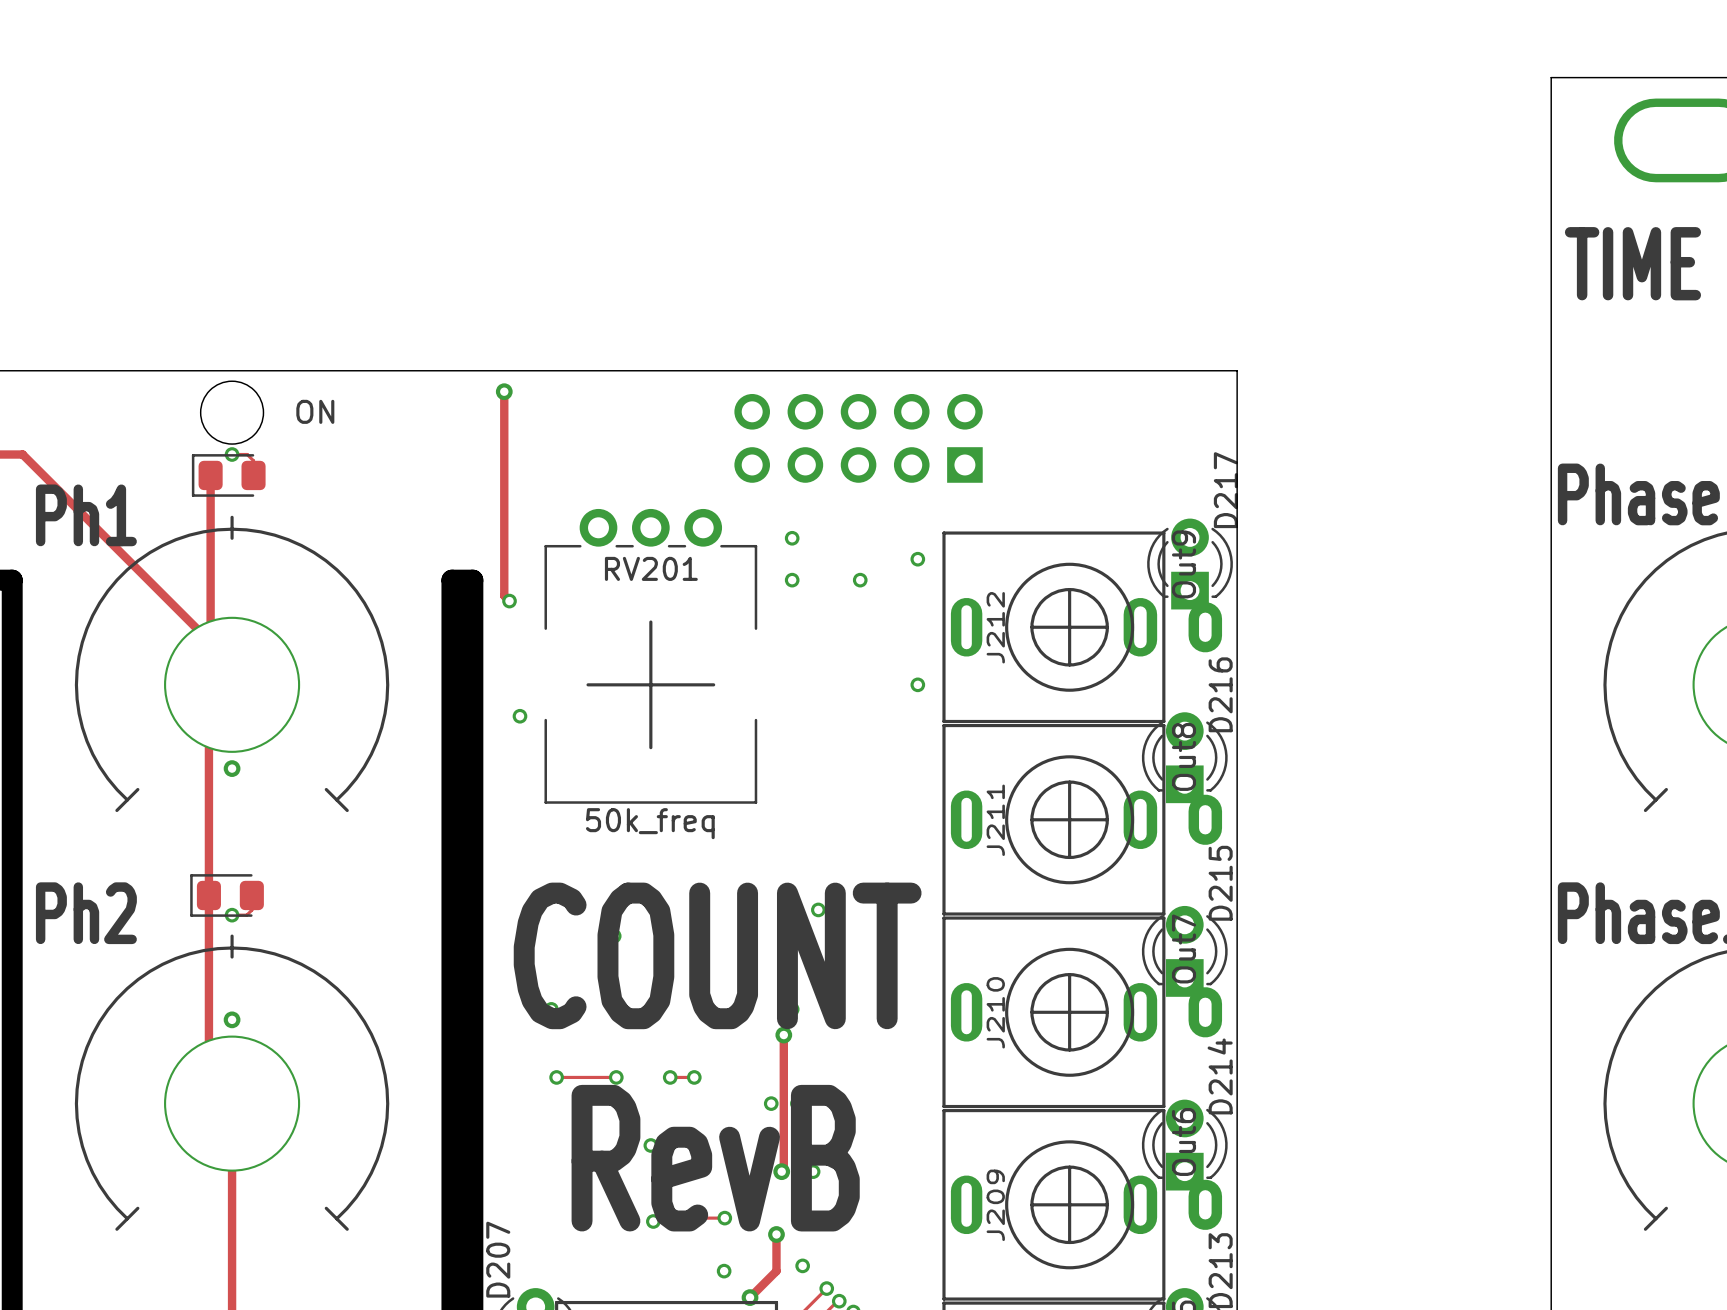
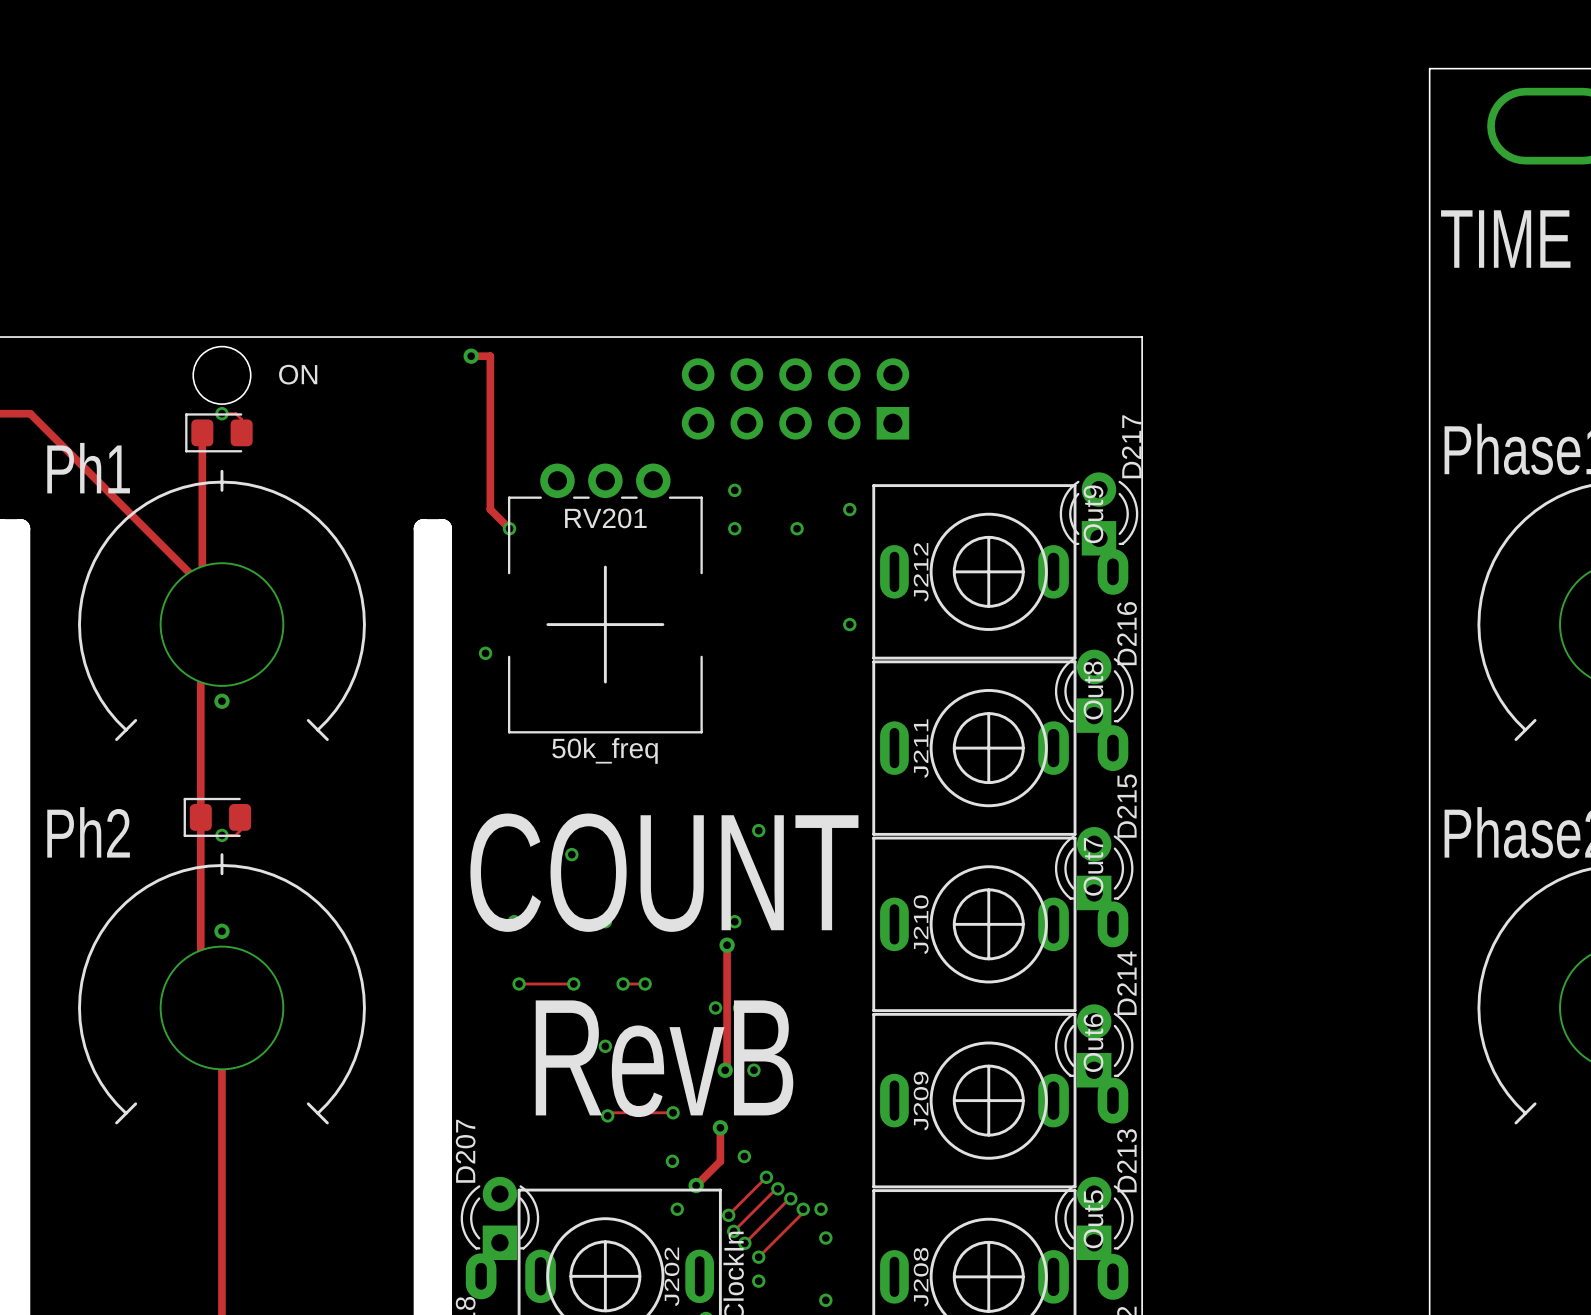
track: (504, 391) (504, 595) (509, 601) -> (471, 356) (490, 356) (490, 509) (509, 528)
via position: (509, 601) -> (509, 528)

